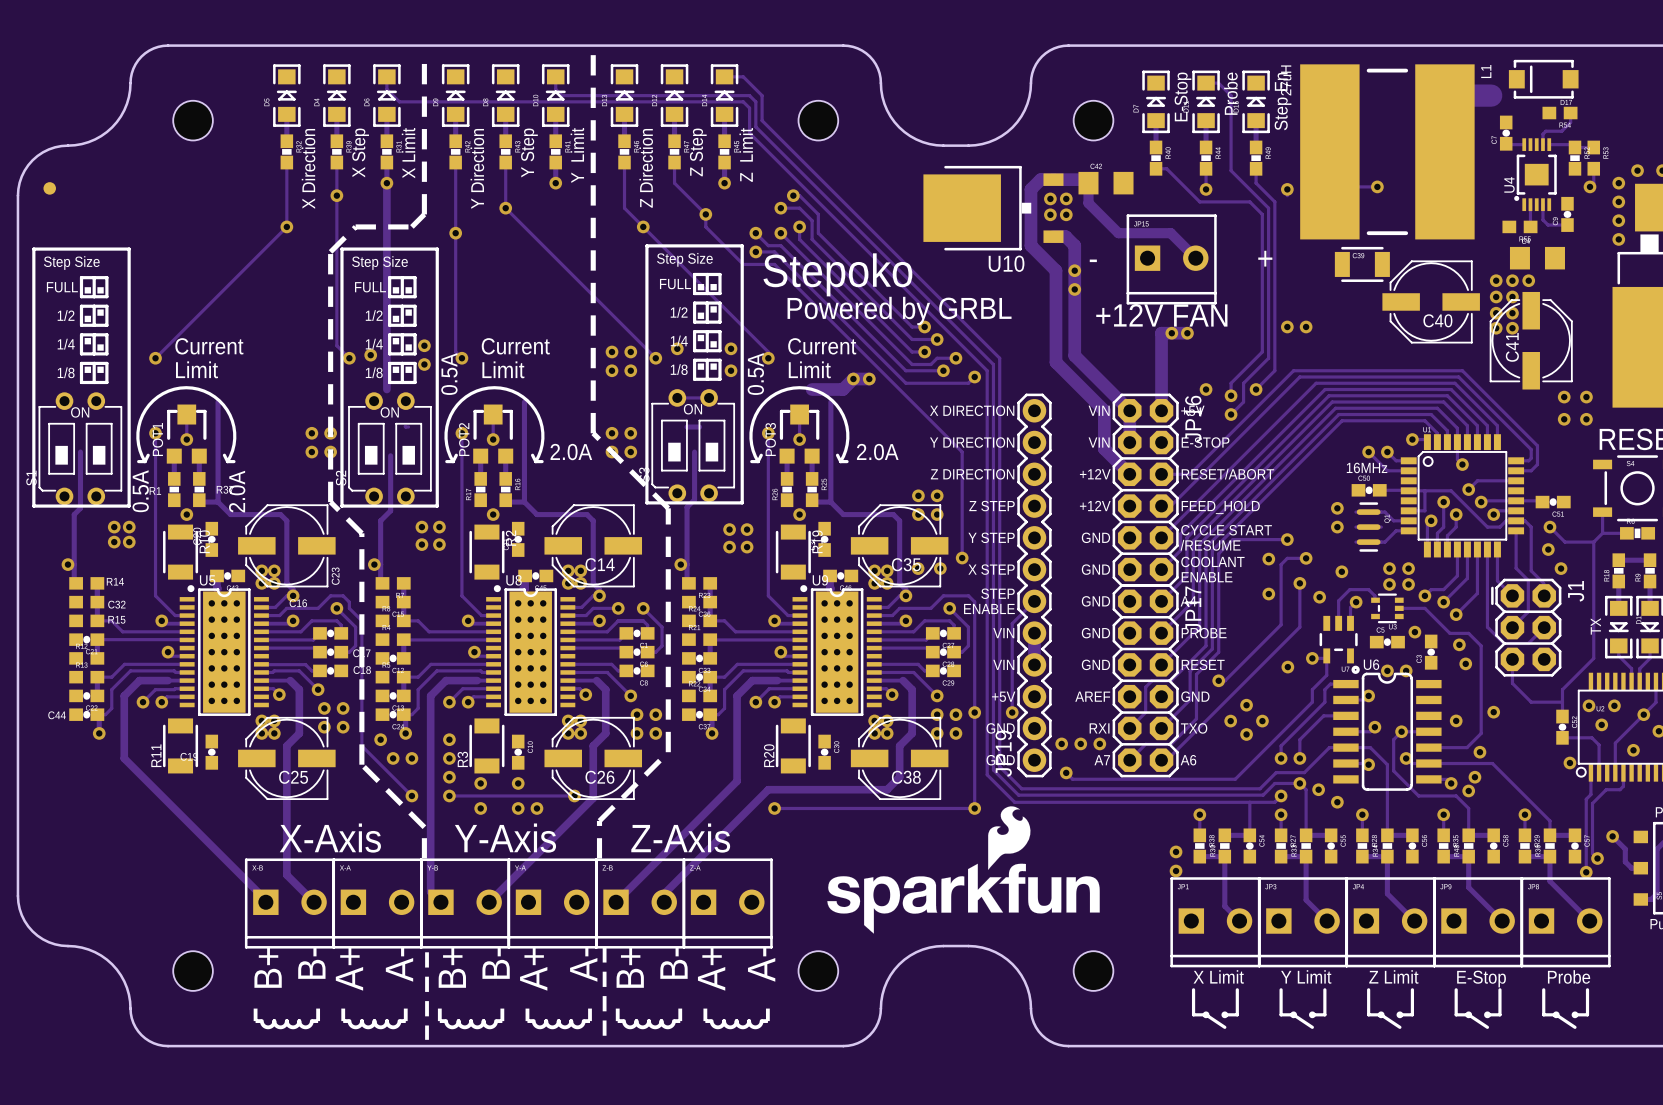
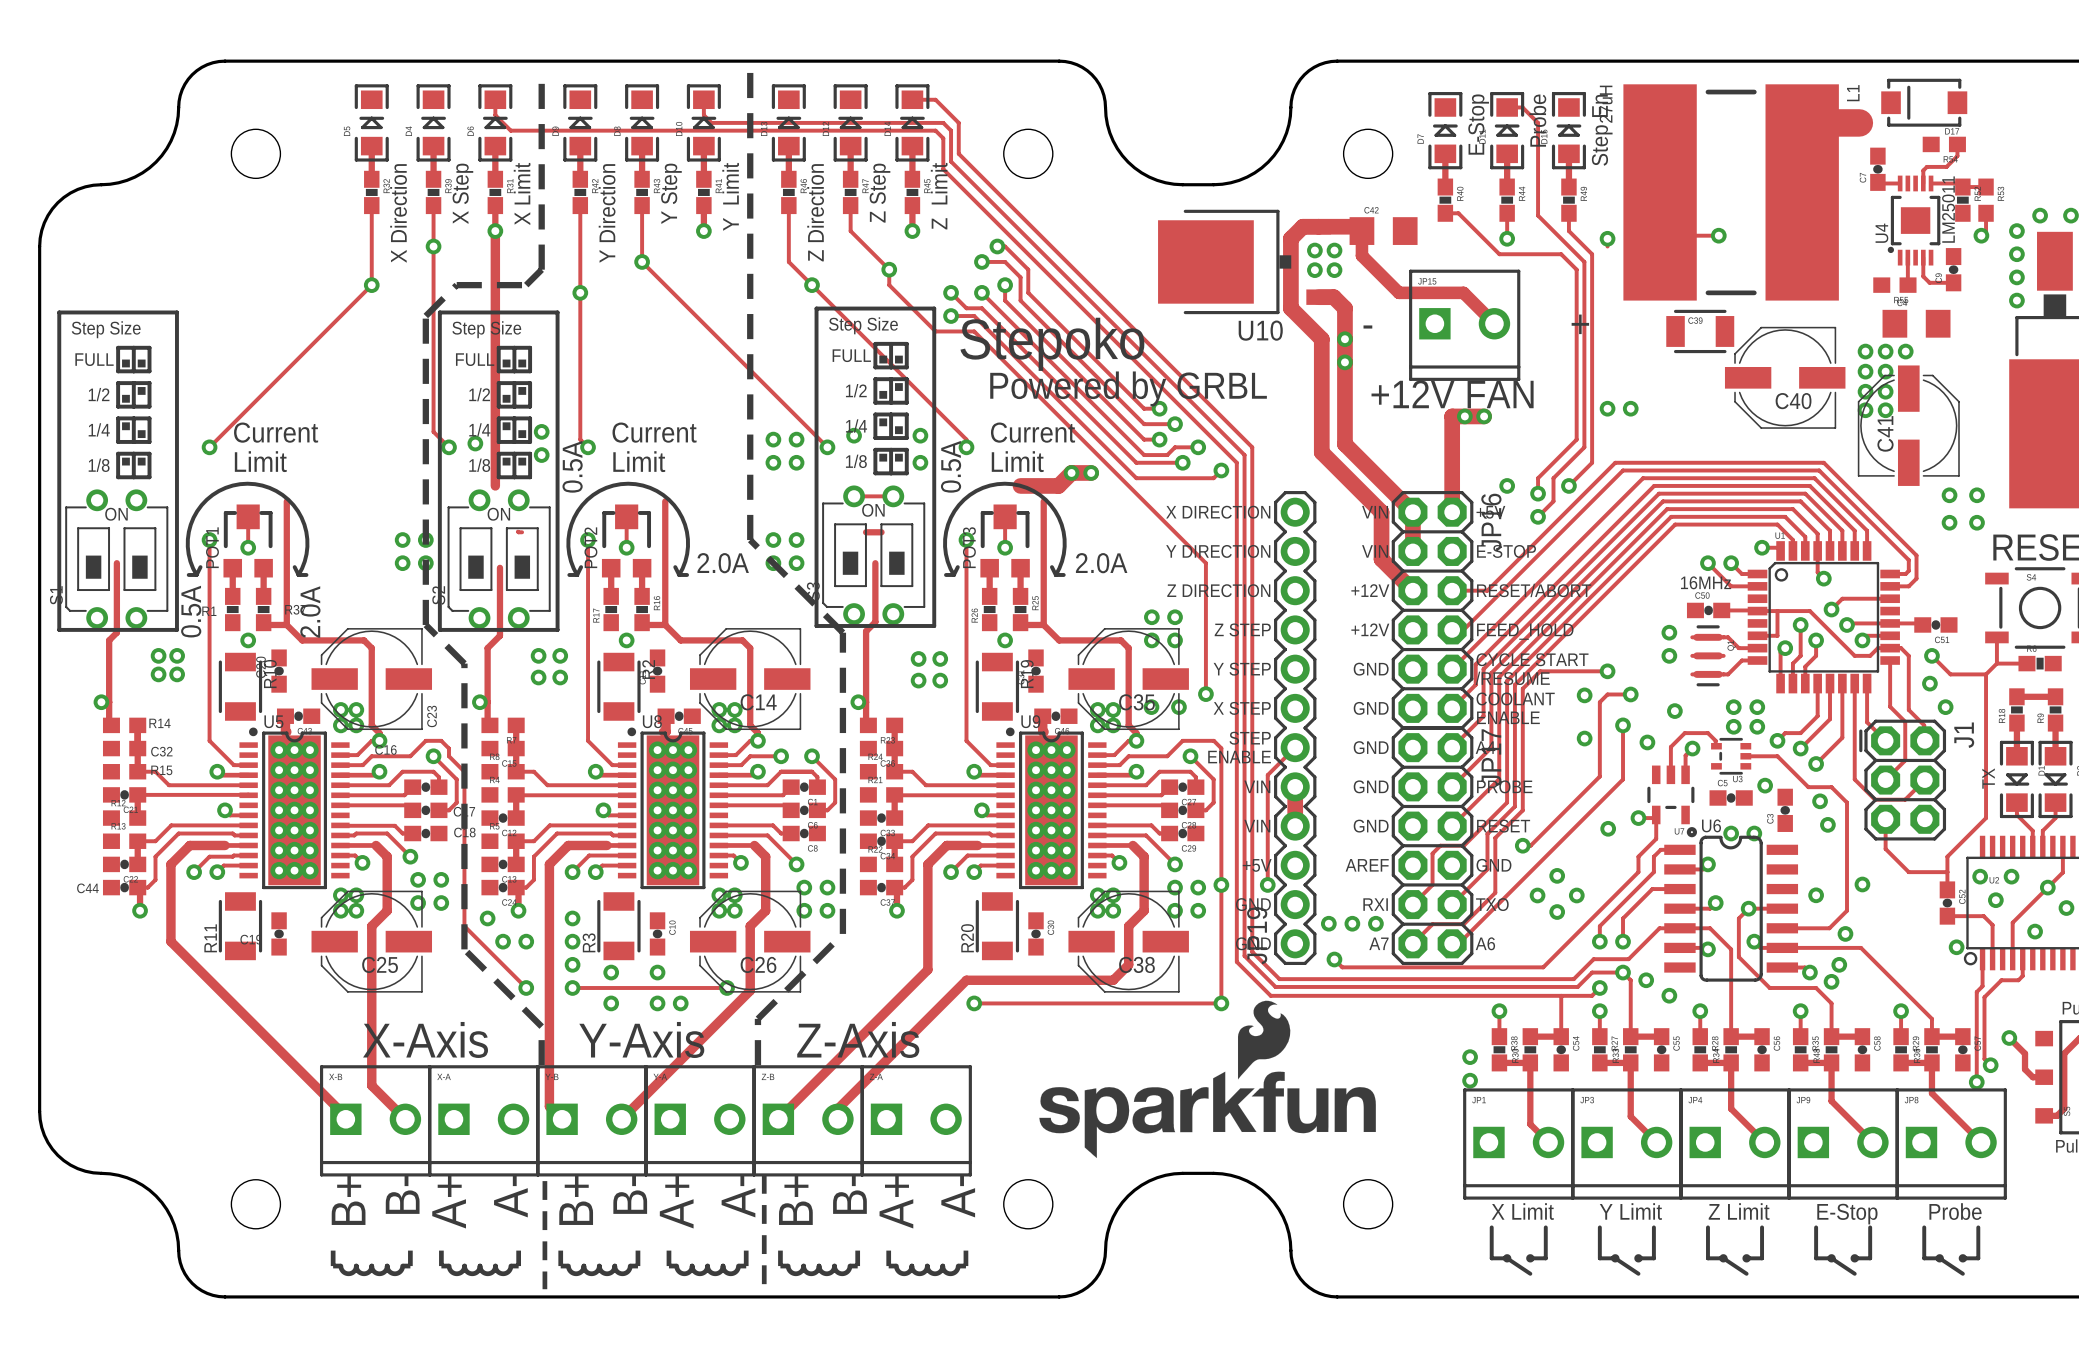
U4 value: none -> LM25011 (1948, 209)
part: (49, 188) -> none

